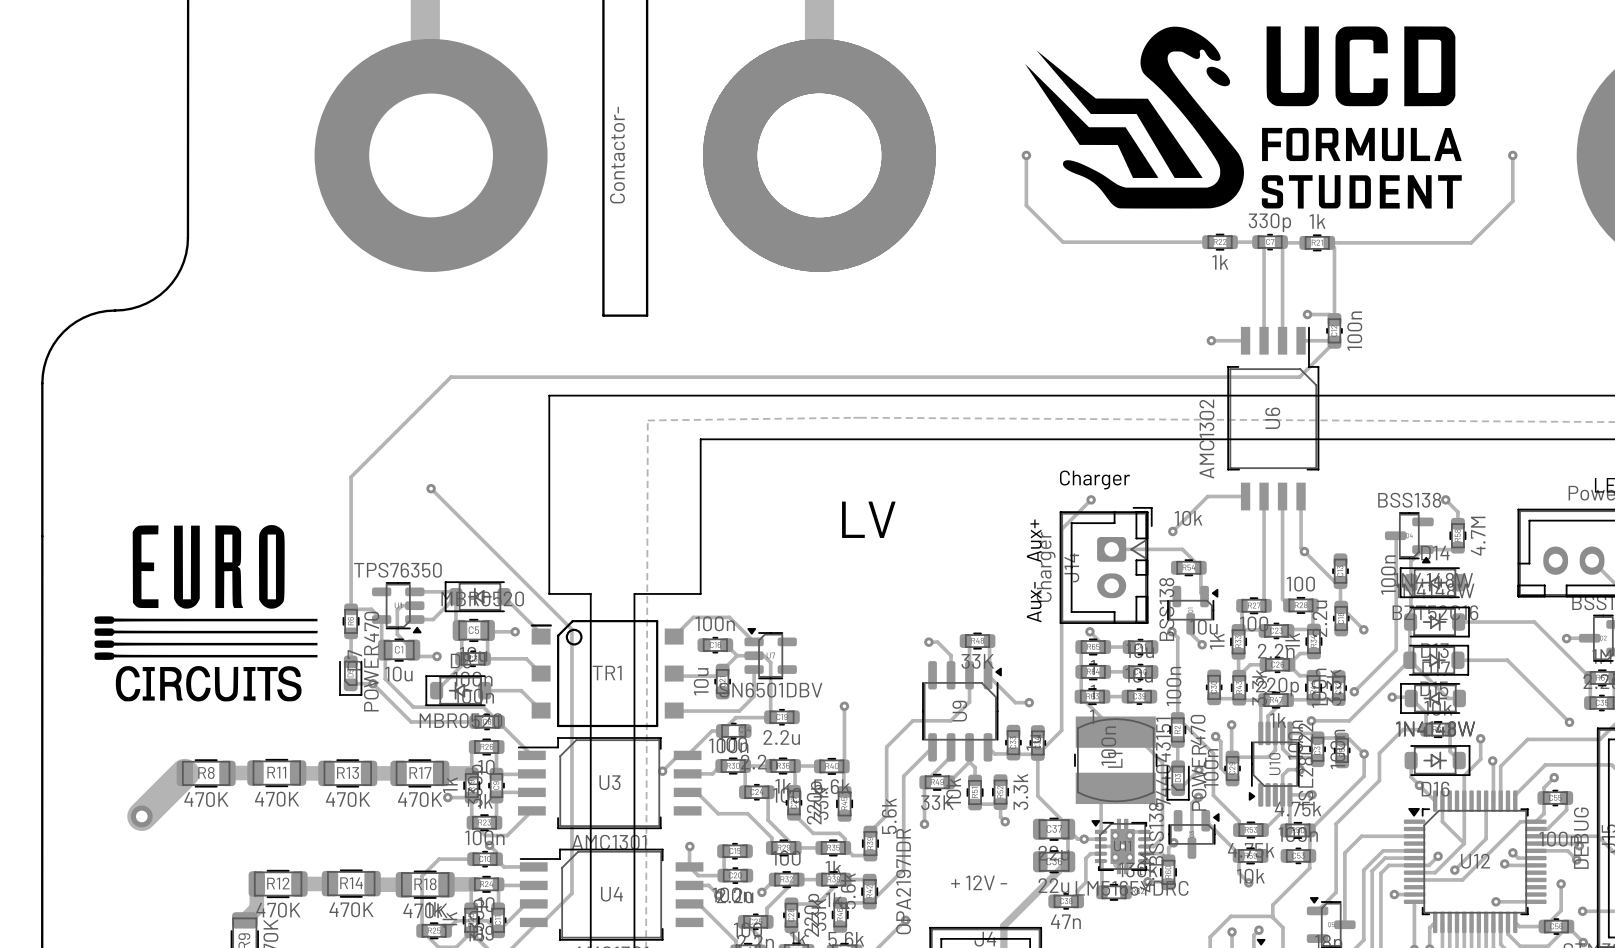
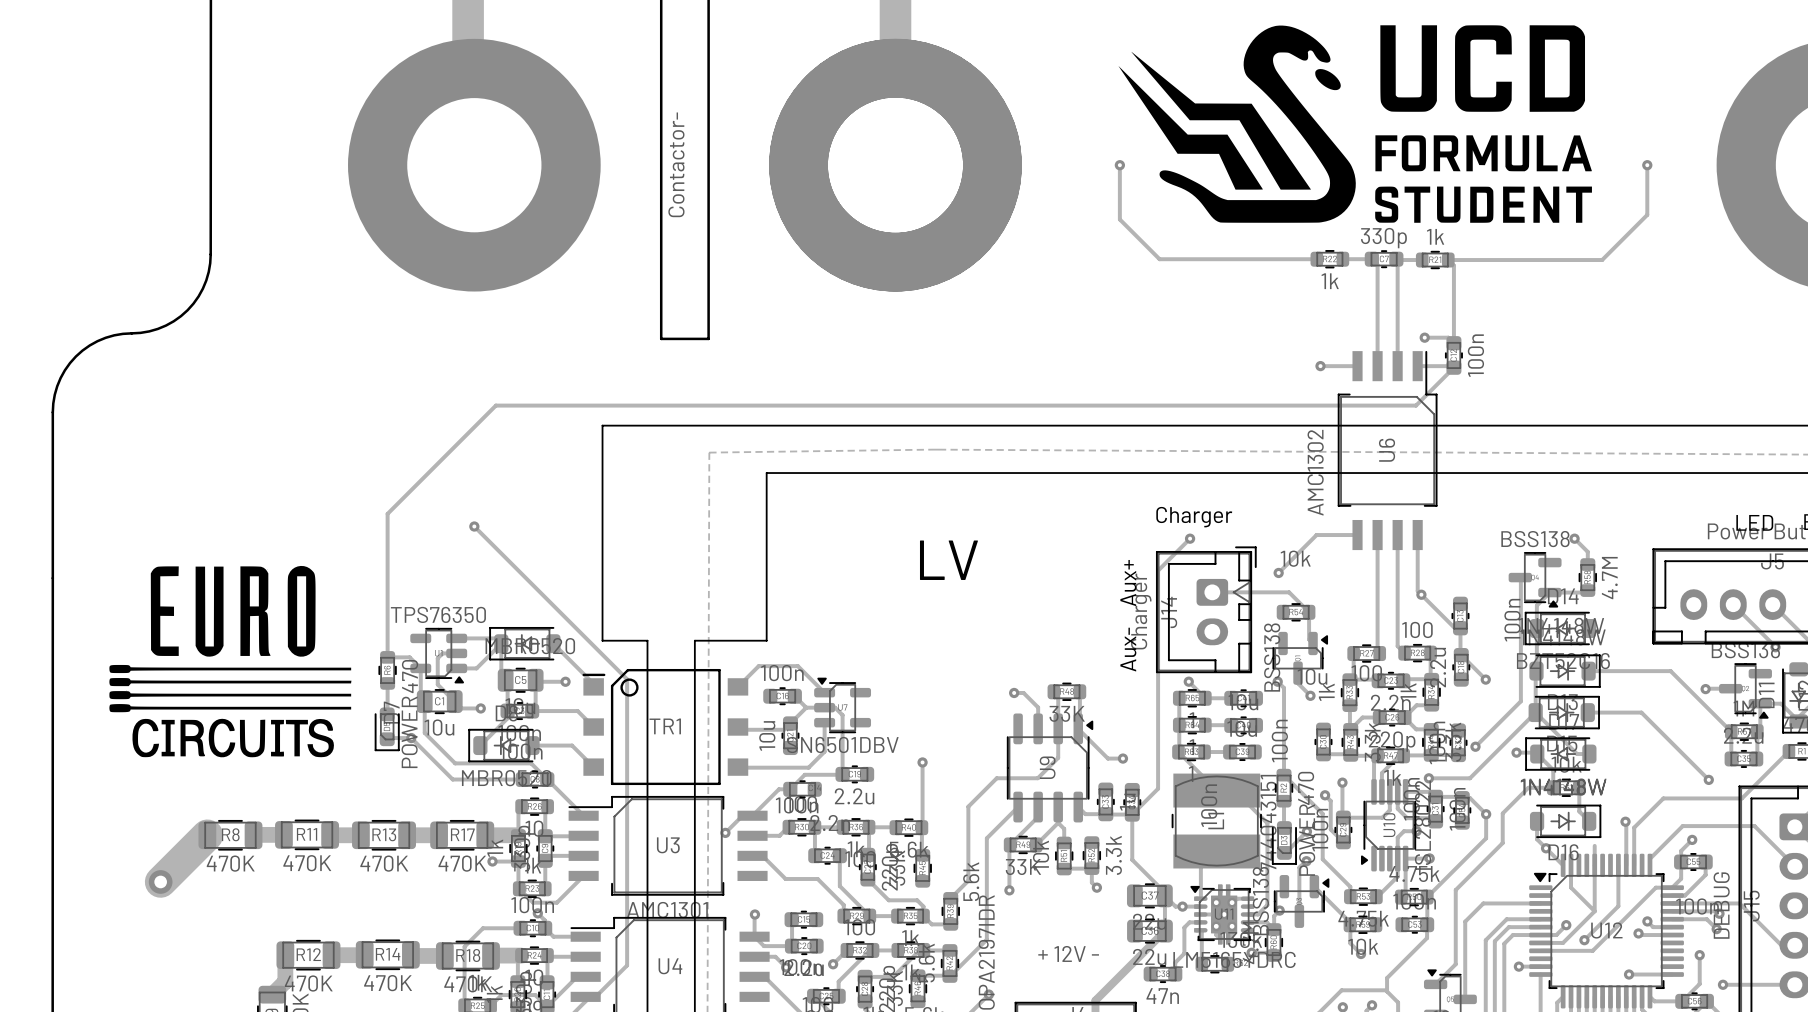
track: (1480, 738) (1480, 759) (1464, 775) (1464, 783) -> none
via: (1480, 738) -> none

